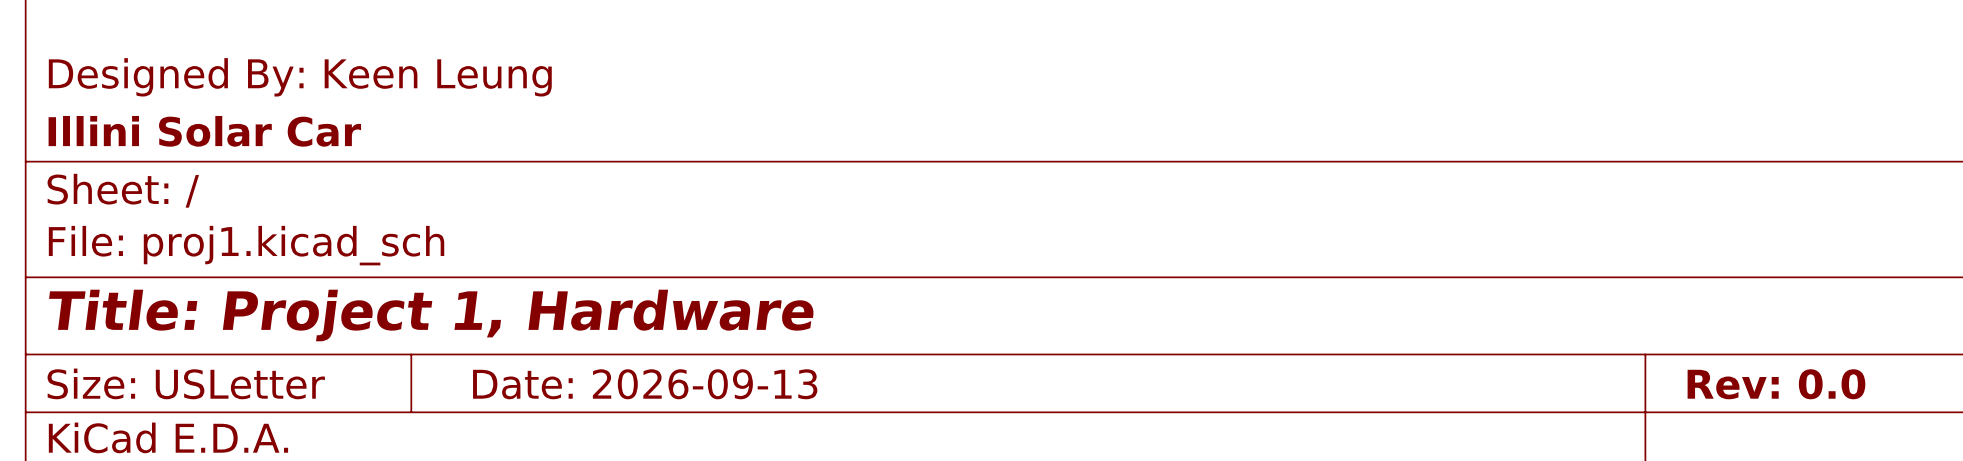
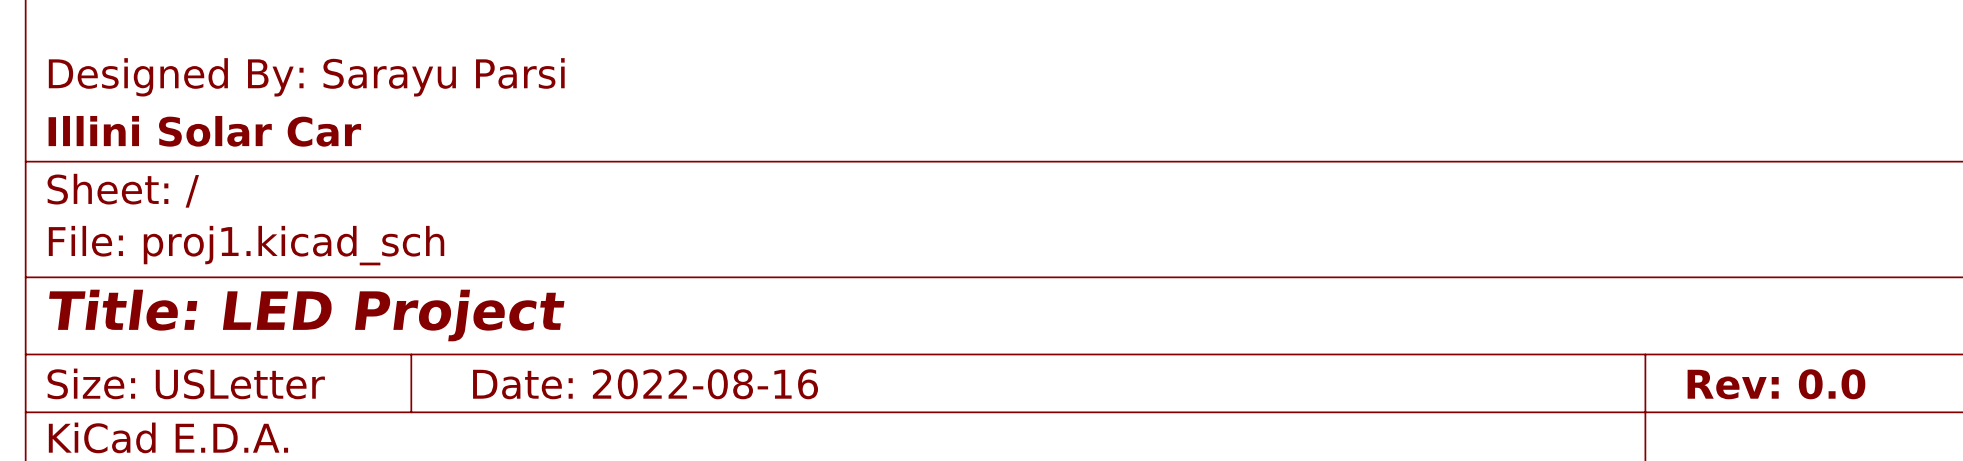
title block: Designed By: Keen Leung (300, 77) -> Designed By: Sarayu Parsi (306, 77)
title block: Title: Project 1, Hardware (431, 315) -> Title: LED Project (306, 315)
title block: Date: 2026-09-13 (645, 384) -> Date: 2022-08-16 (645, 384)

